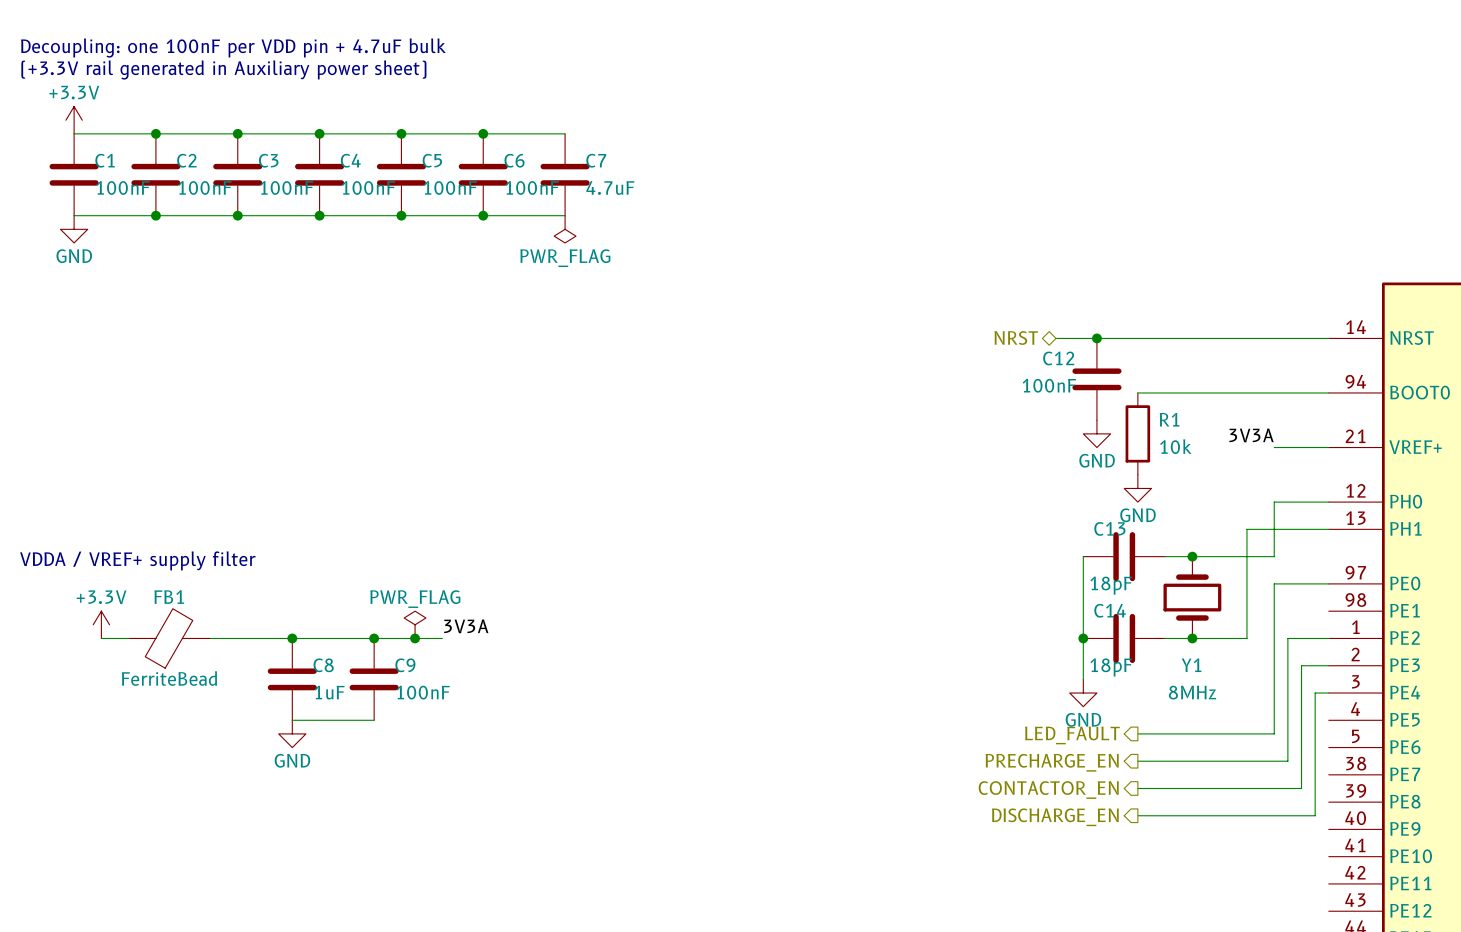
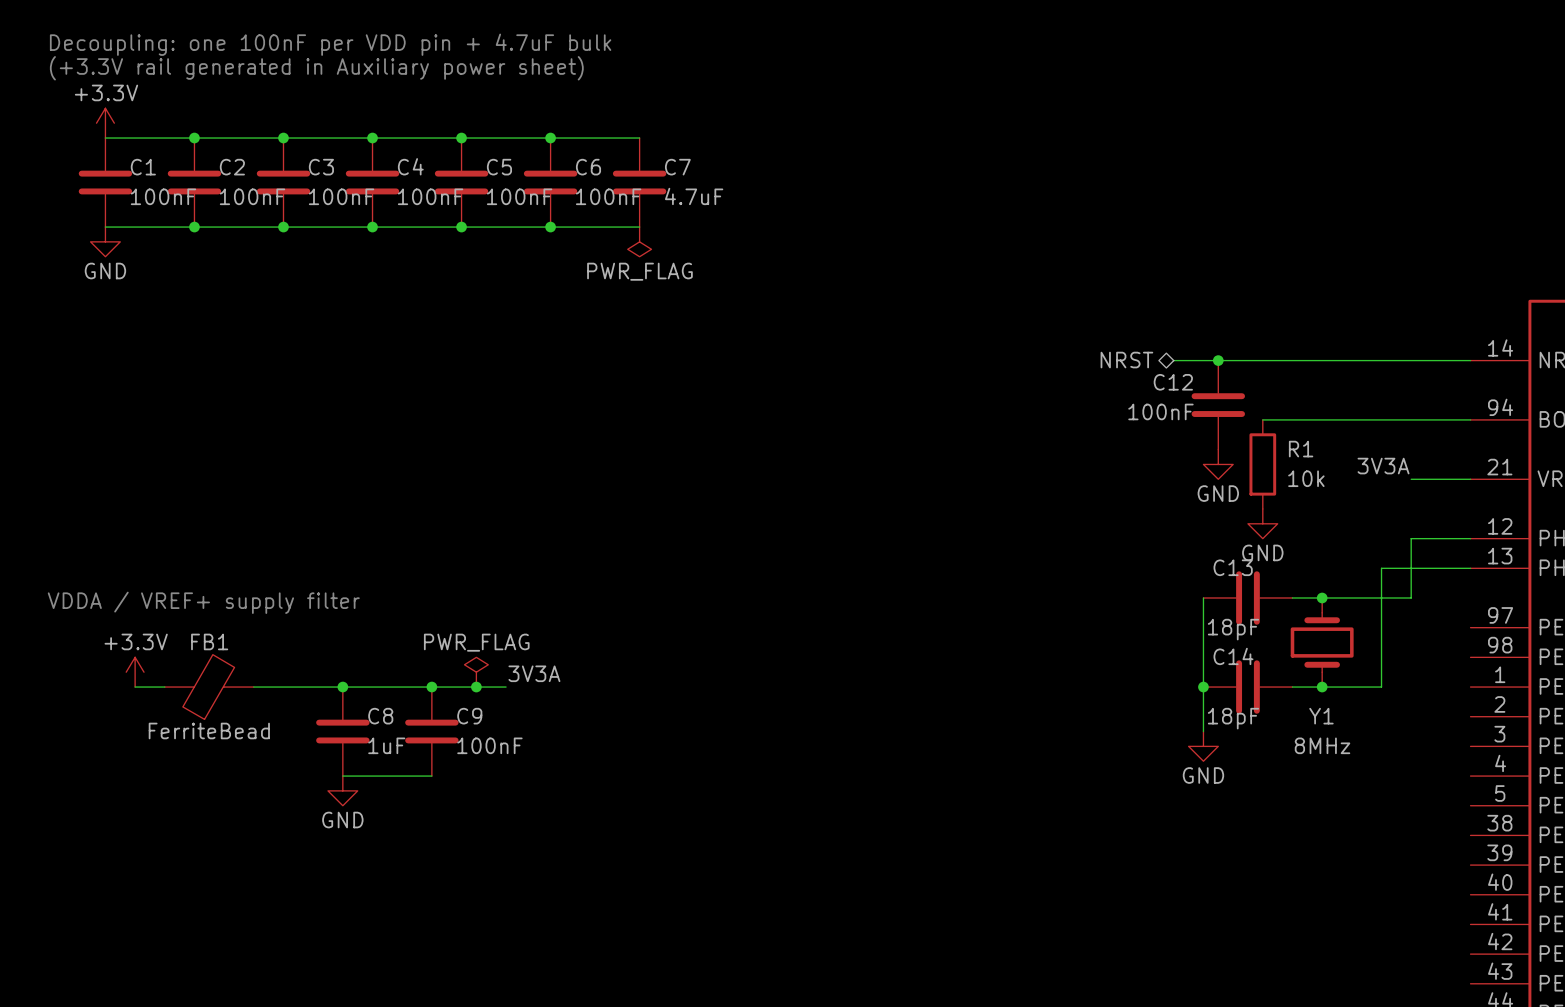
wire: (1328, 583) (1274, 583) (1274, 733) (1137, 733) -> none
wire: (1328, 638) (1287, 638) (1287, 761) (1137, 761) -> none
wire: (1328, 665) (1301, 665) (1301, 788) (1137, 788) -> none
wire: (1328, 693) (1315, 693) (1315, 815) (1137, 815) -> none
hierarchical label: LED_FAULT (1072, 735) -> none
hierarchical label: PRECHARGE_EN (1052, 762) -> none
hierarchical label: CONTACTOR_EN (1048, 790) -> none
hierarchical label: DISCHARGE_EN (1055, 817) -> none

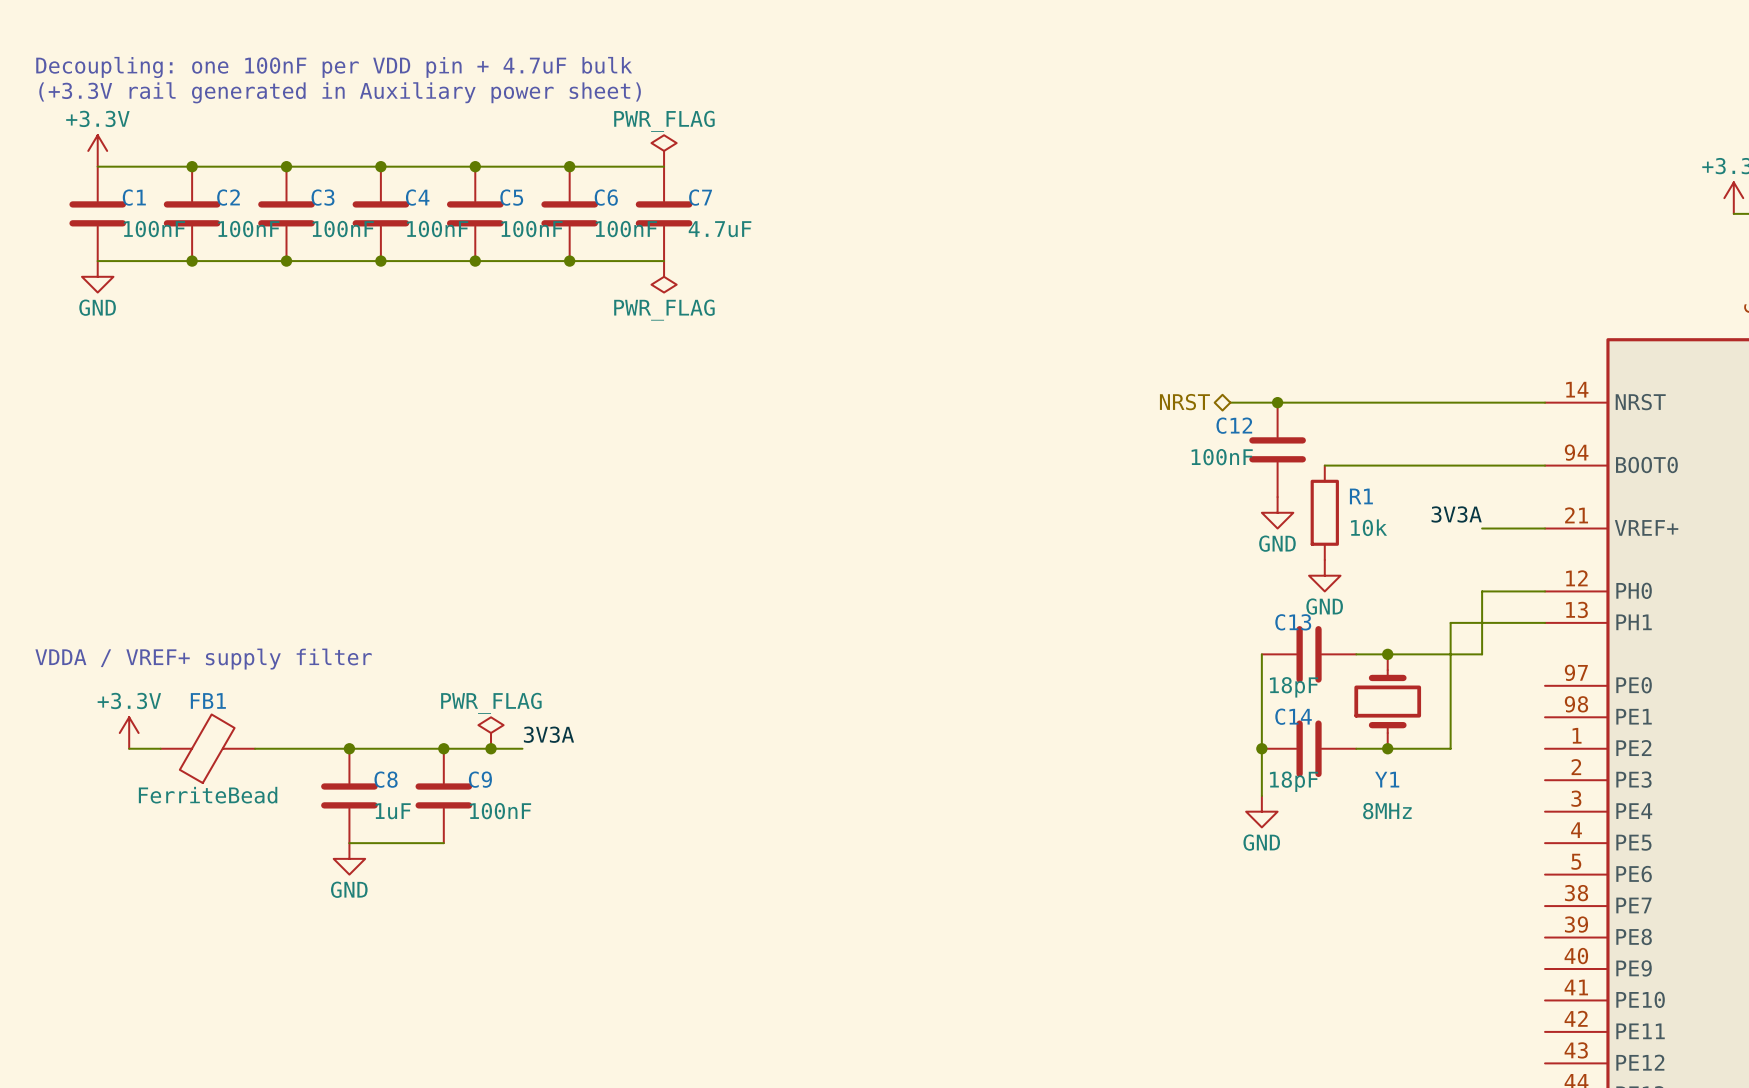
power symbol: none -> PWR_FLAG (664, 150)

